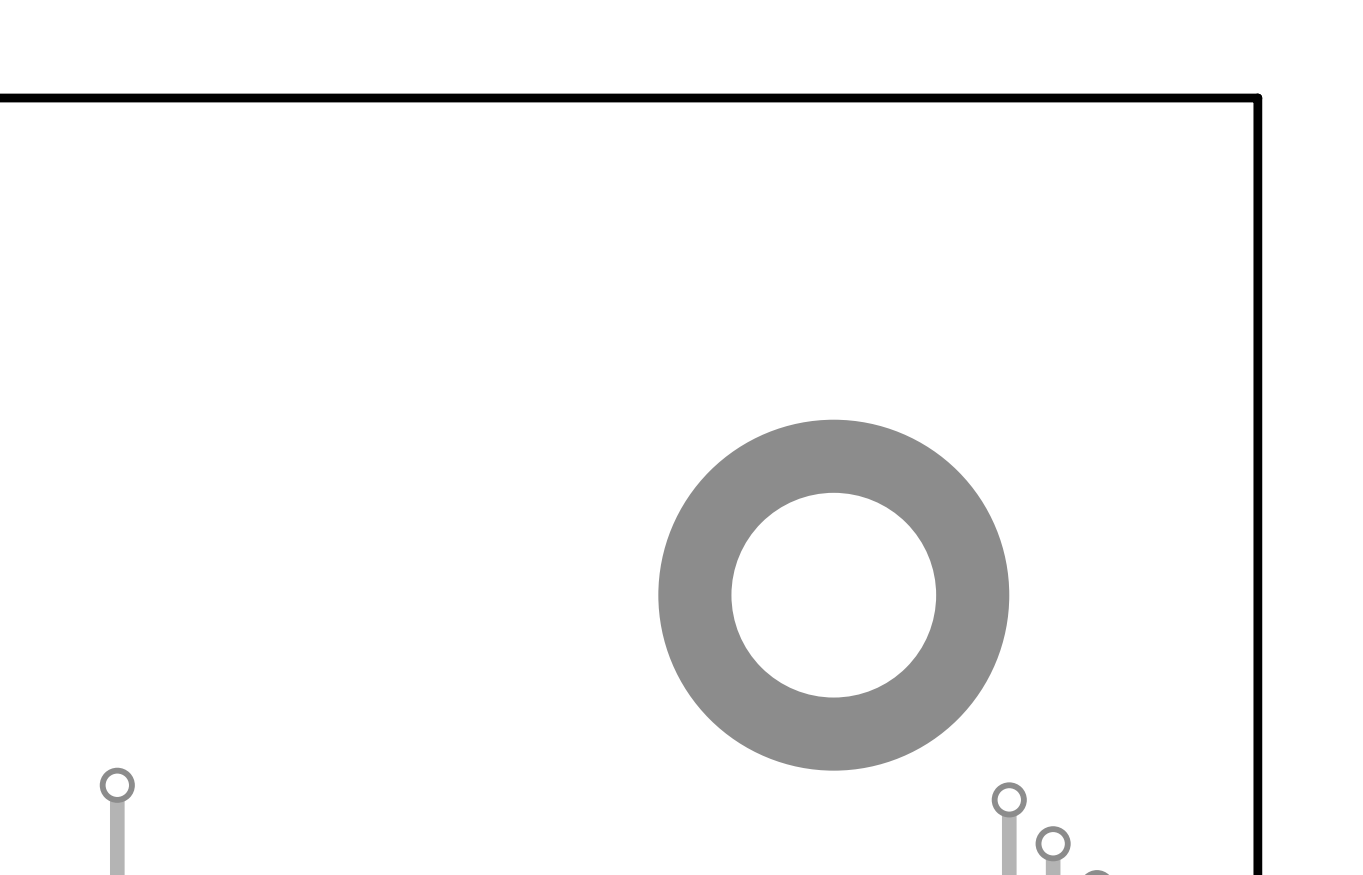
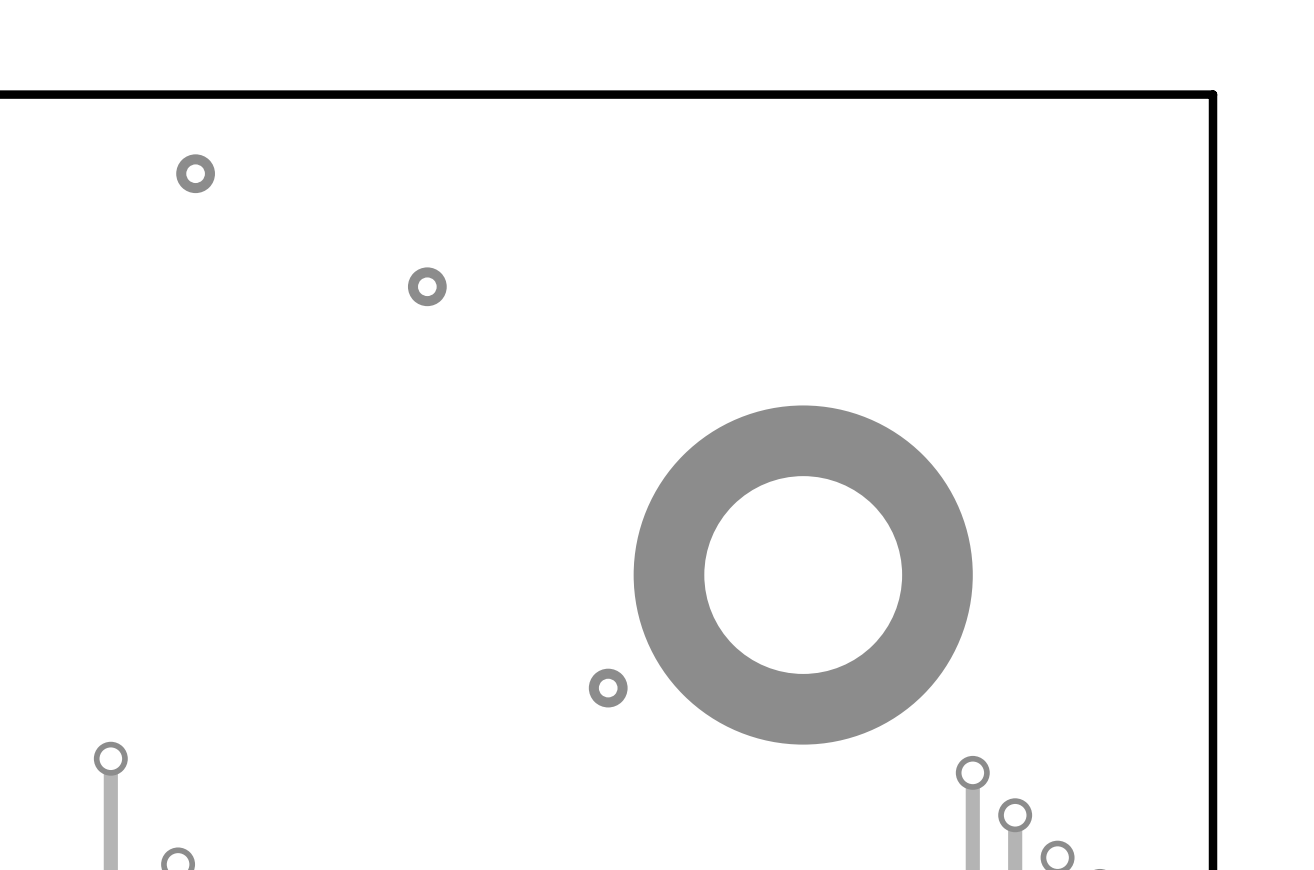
via: none -> (195, 173)
via: none -> (427, 286)
via: none -> (608, 688)

